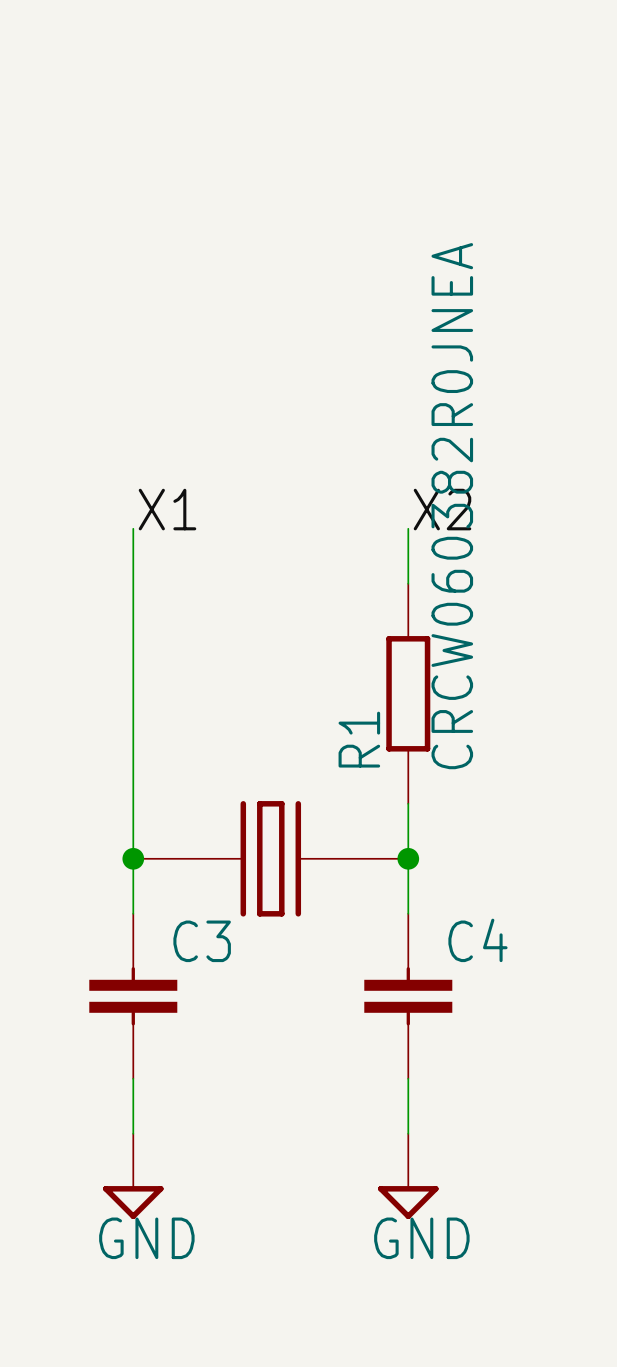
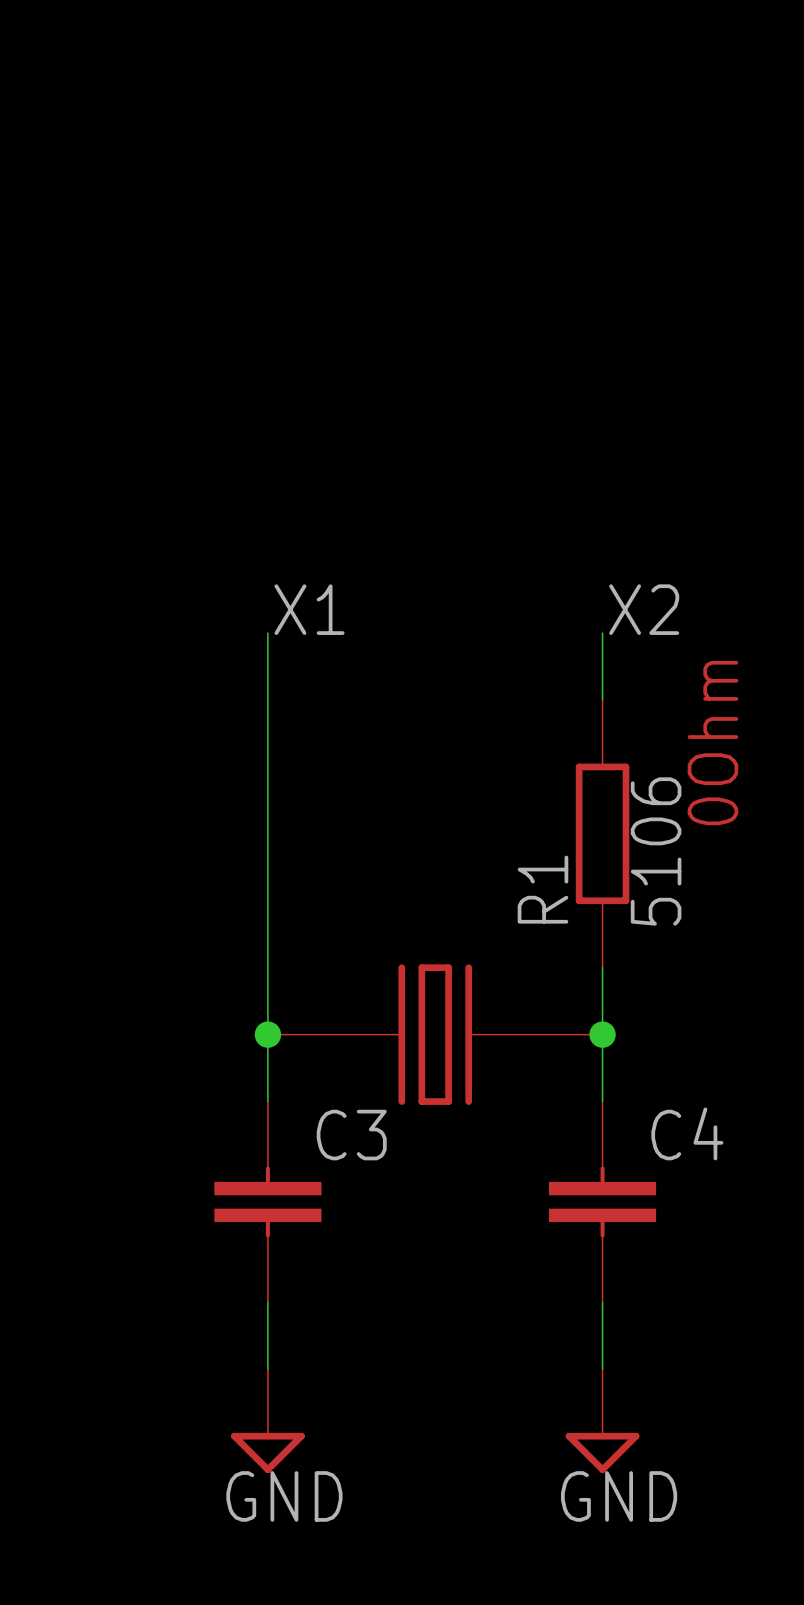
R1 value: CRCW060382R0JNEA (452, 506) -> 5106 (656, 851)
R1 text: none -> 0Ohm (712, 743)

